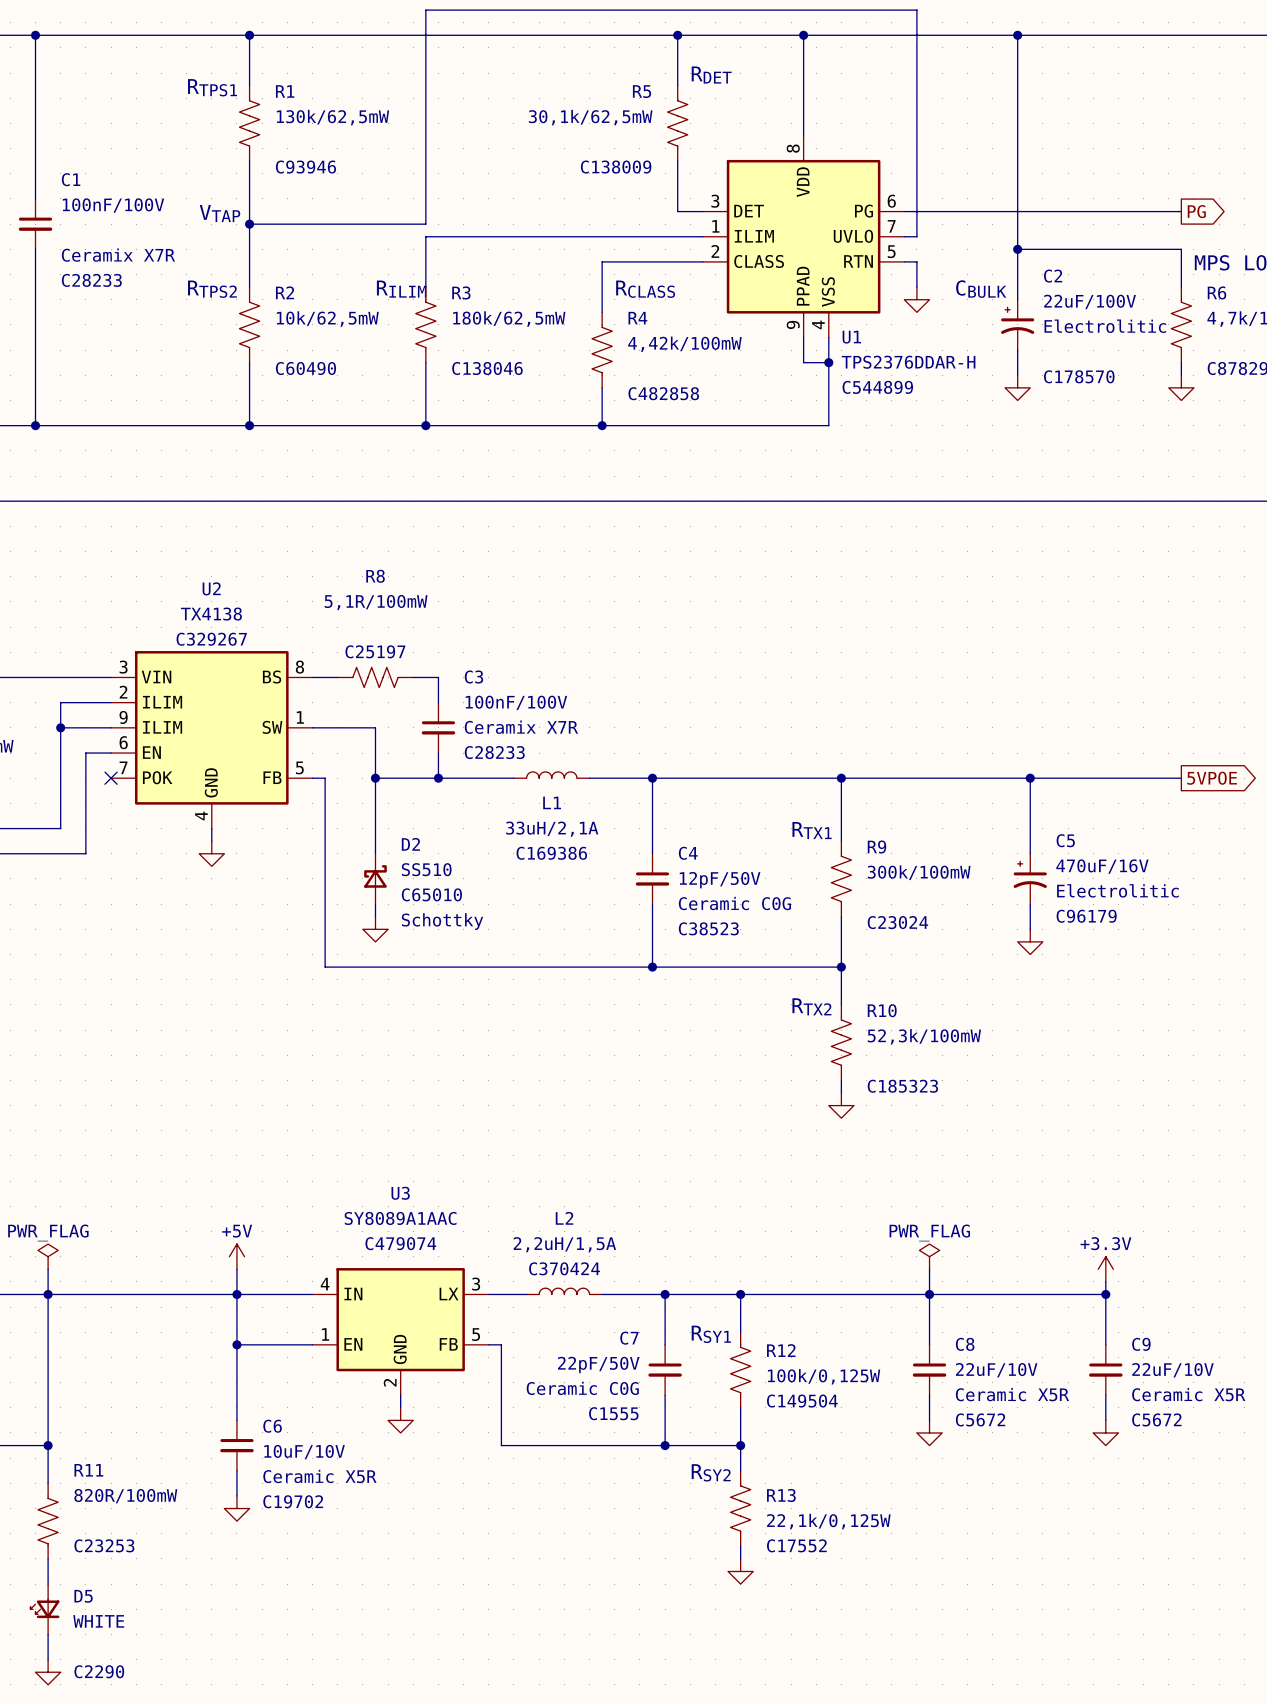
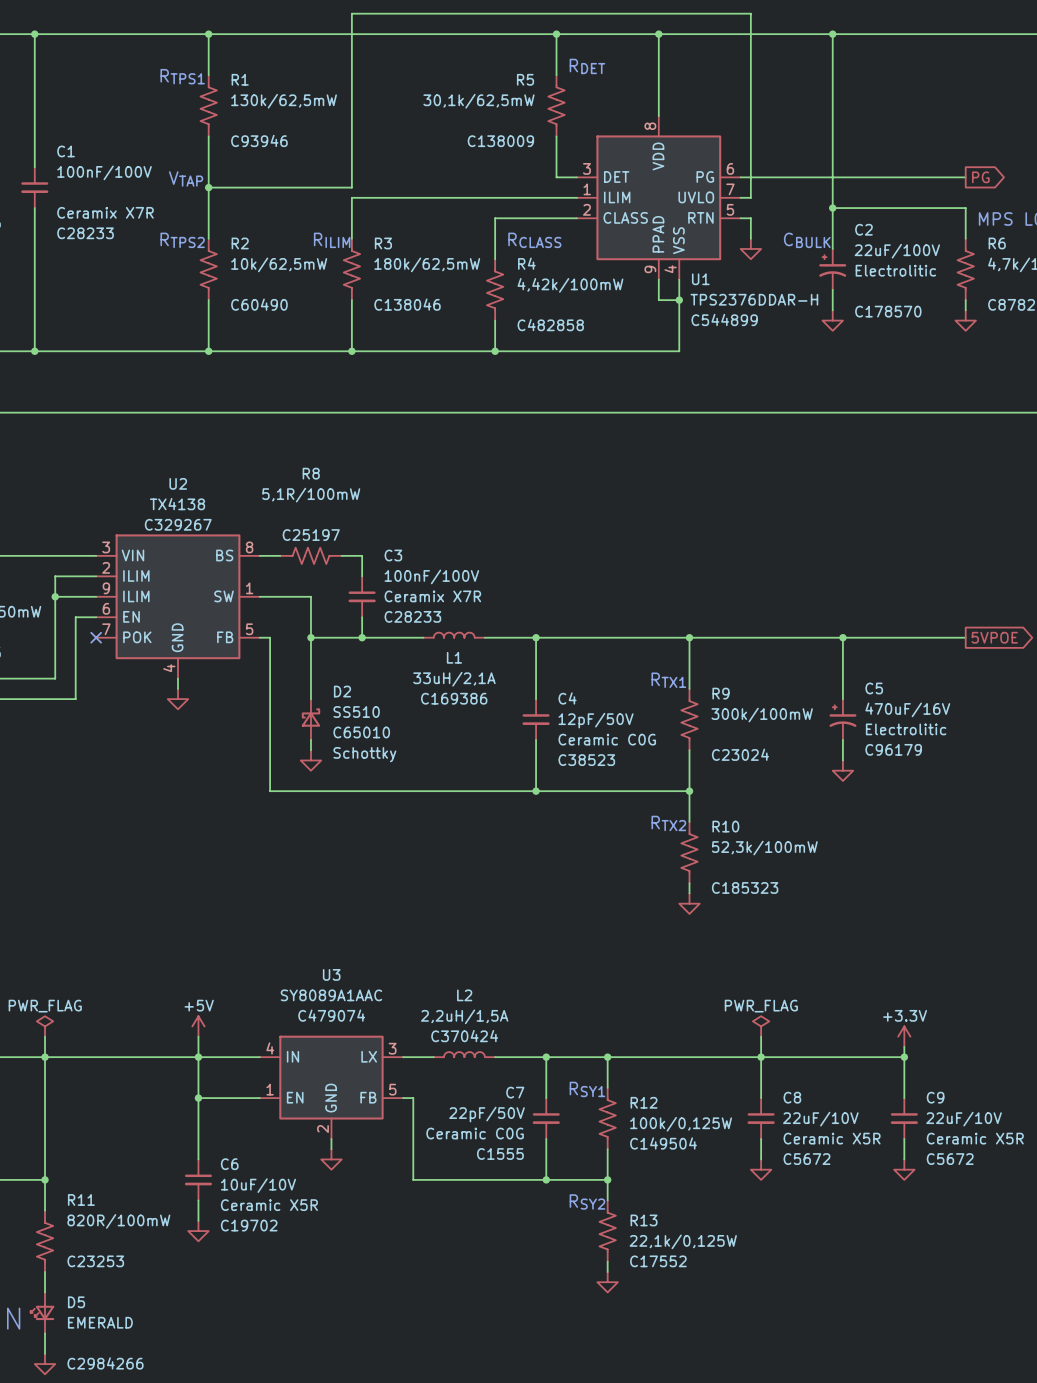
D5 value: WHITE (98, 1621) -> EMERALD (100, 1322)
D5 text: C2290 (99, 1671) -> C2984266 (105, 1363)

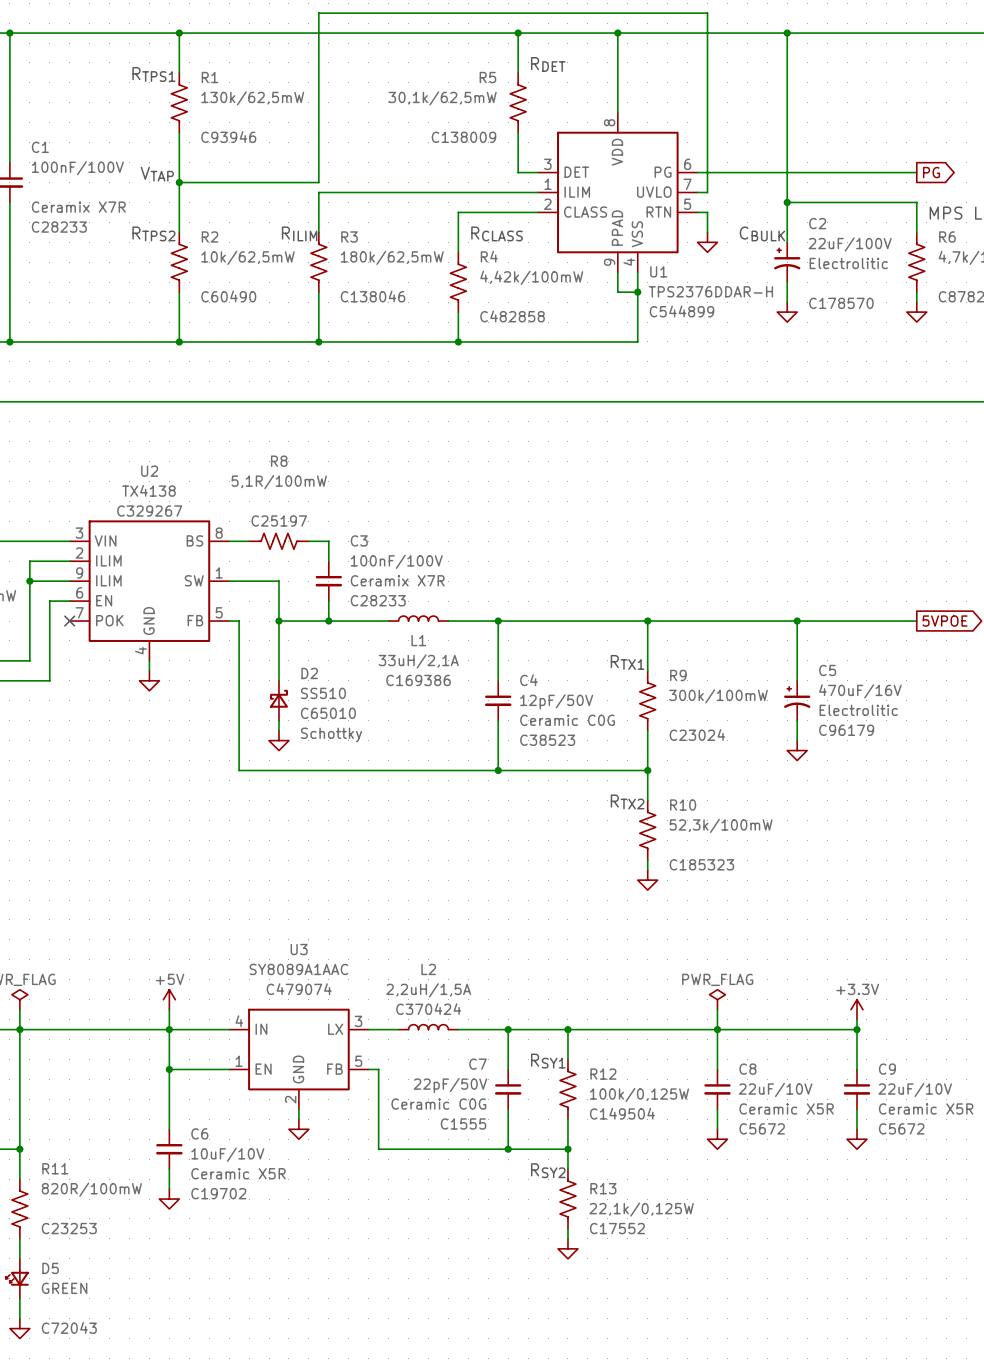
D5 value: EMERALD (100, 1322) -> GREEN (64, 1288)
D5 text: C2984266 (105, 1363) -> C72043 (69, 1327)

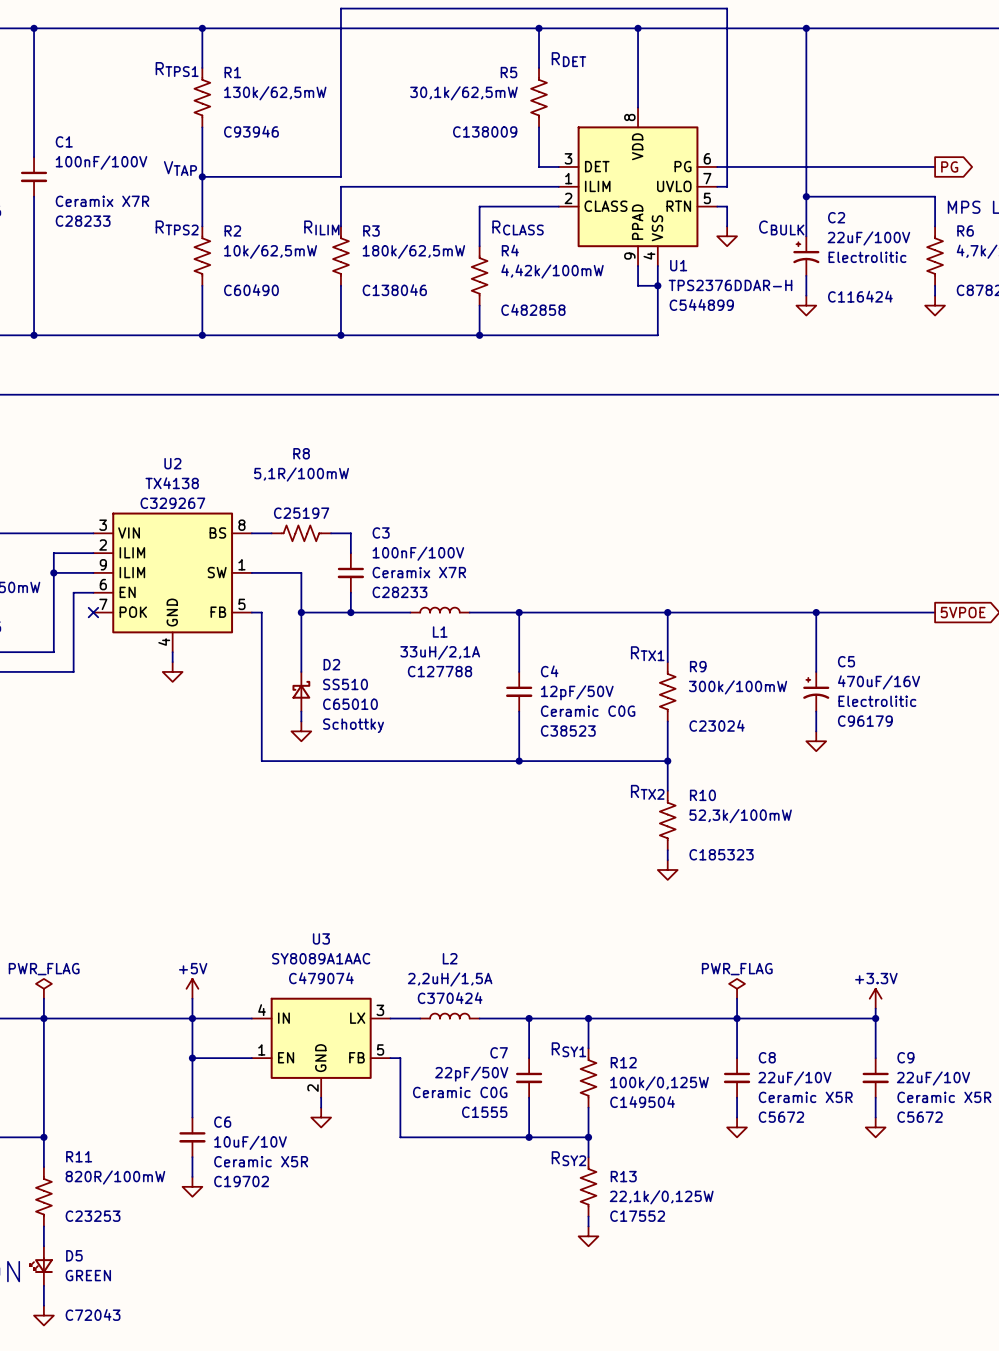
C2 text: C178570 (841, 303) -> C116424 (860, 296)
L1 text: C169386 (418, 680) -> C127788 (439, 671)

